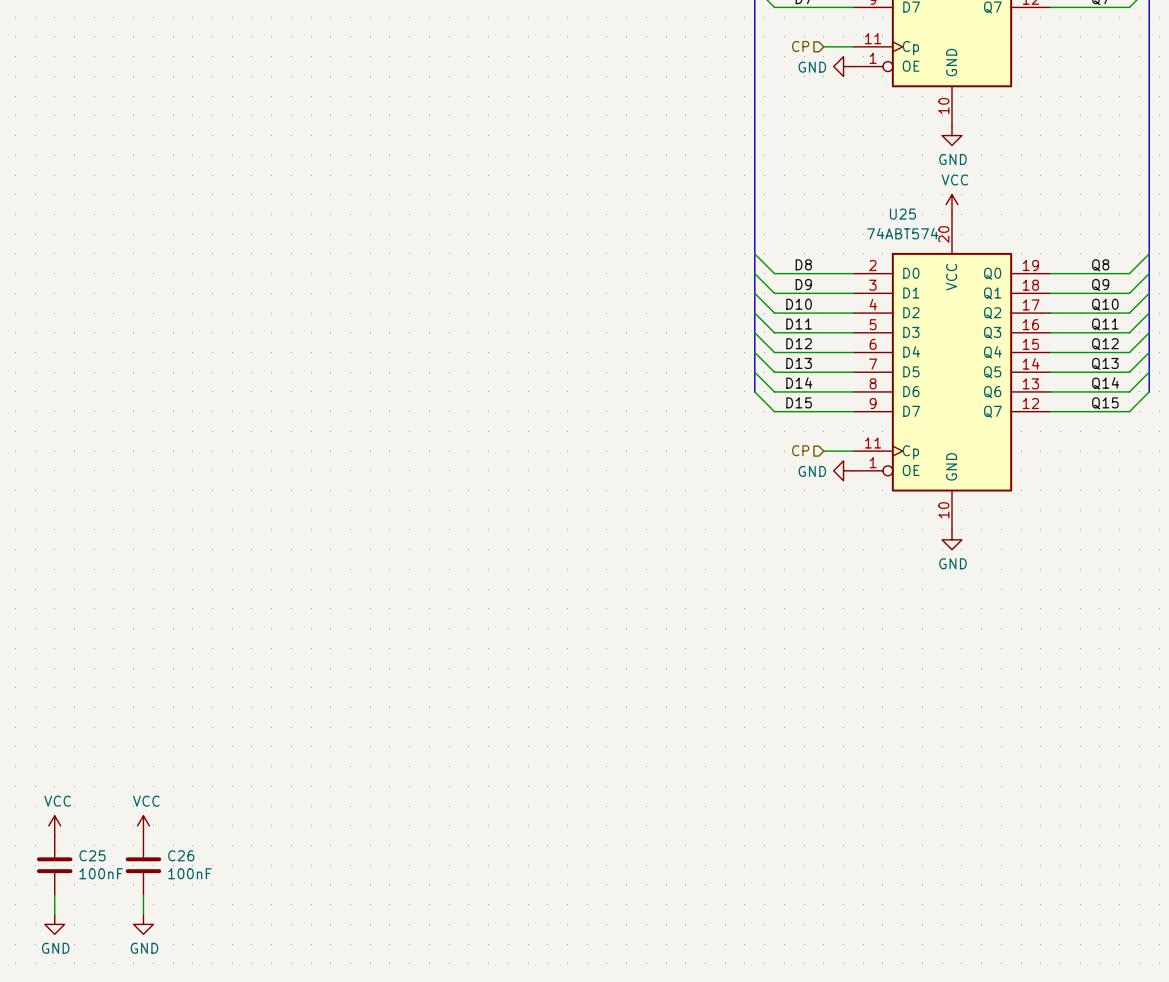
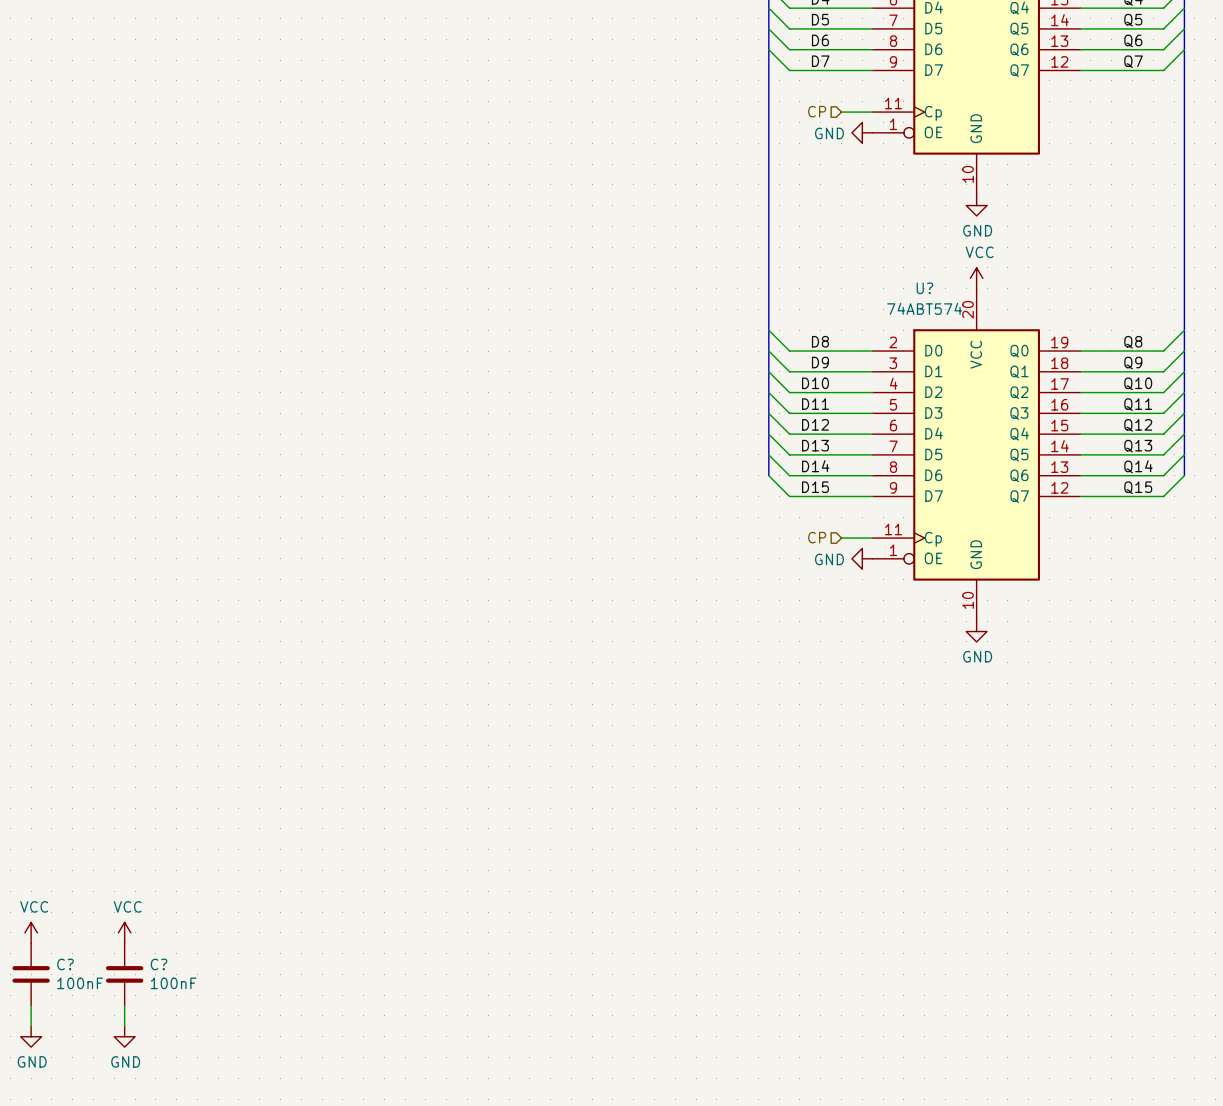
U25 name: U25 (902, 214) -> U? (924, 288)
C25 name: C25 (92, 855) -> C? (65, 964)
C26 name: C26 (181, 855) -> C? (159, 964)

